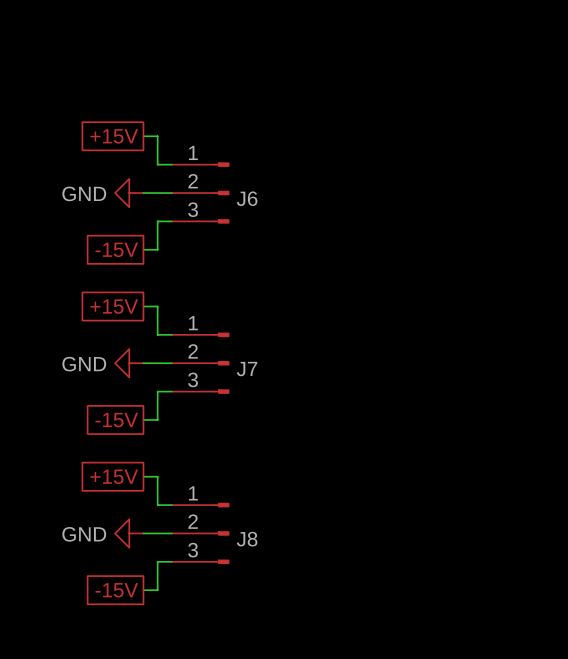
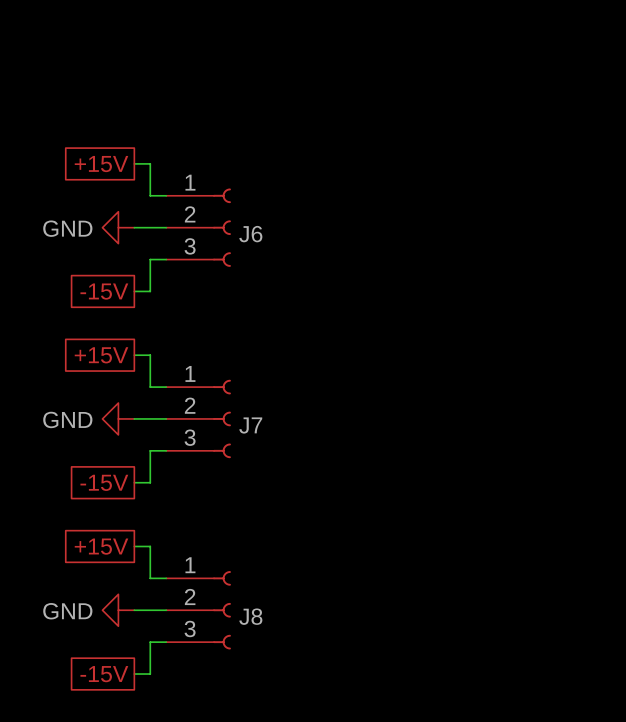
J6 symbol: [171, 162, 230, 224] -> [166, 188, 231, 267]
J7 symbol: [171, 332, 230, 394] -> [166, 379, 231, 459]
J8 symbol: [171, 502, 230, 565] -> [166, 571, 231, 650]

